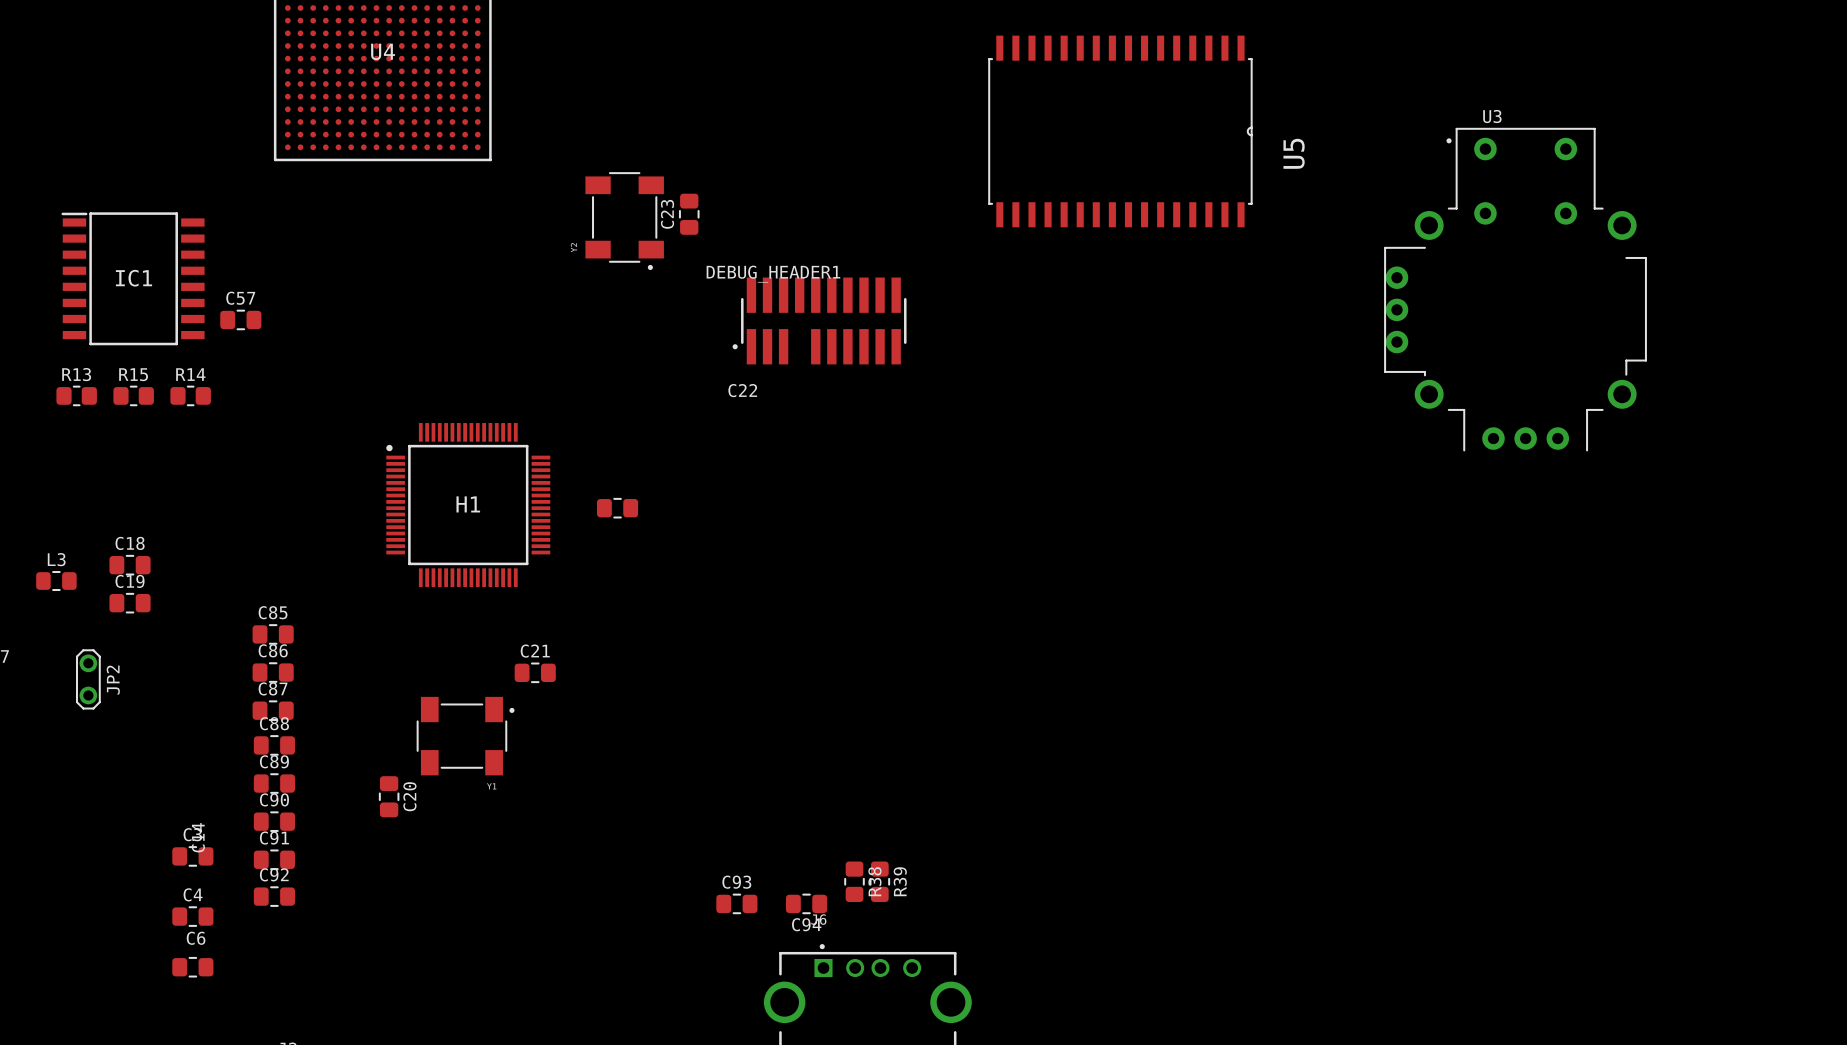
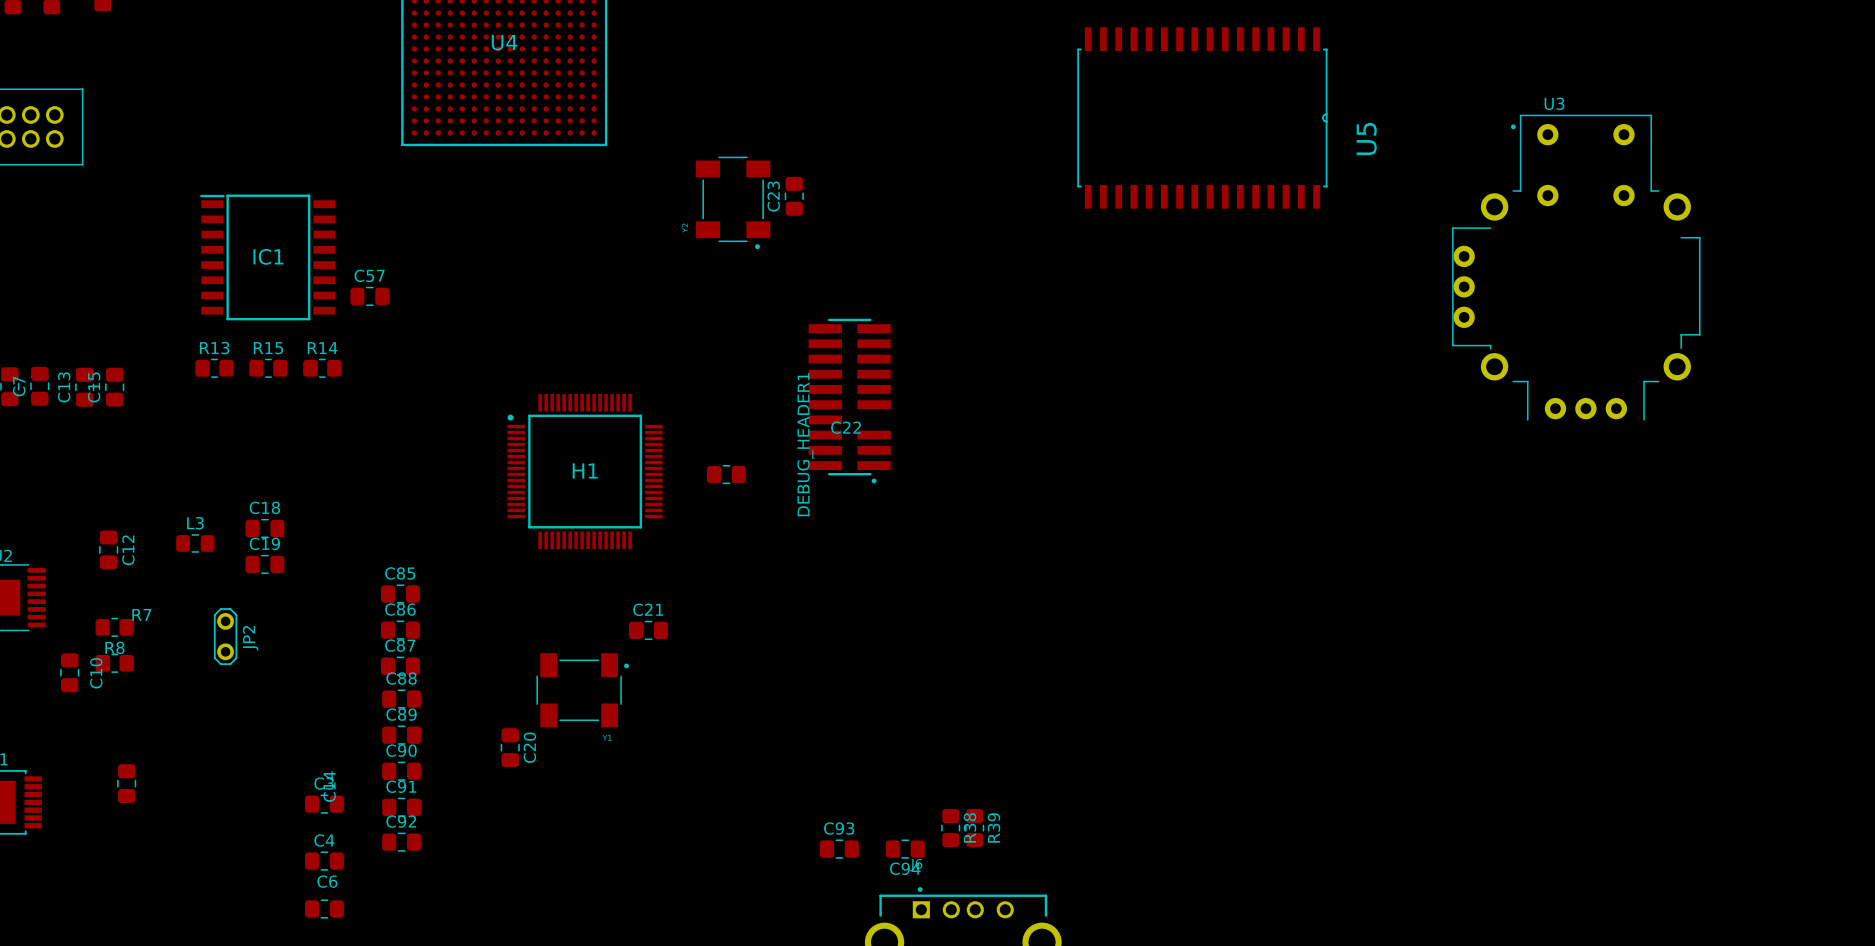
DEBUG_HEADER1 rotation: 0° (819, 320) -> 90° counterclockwise (849, 401)
DEBUG_HEADER1 position: (819, 320) -> (849, 401)
C22 name position: C22 (742, 390) -> C22 (846, 427)

